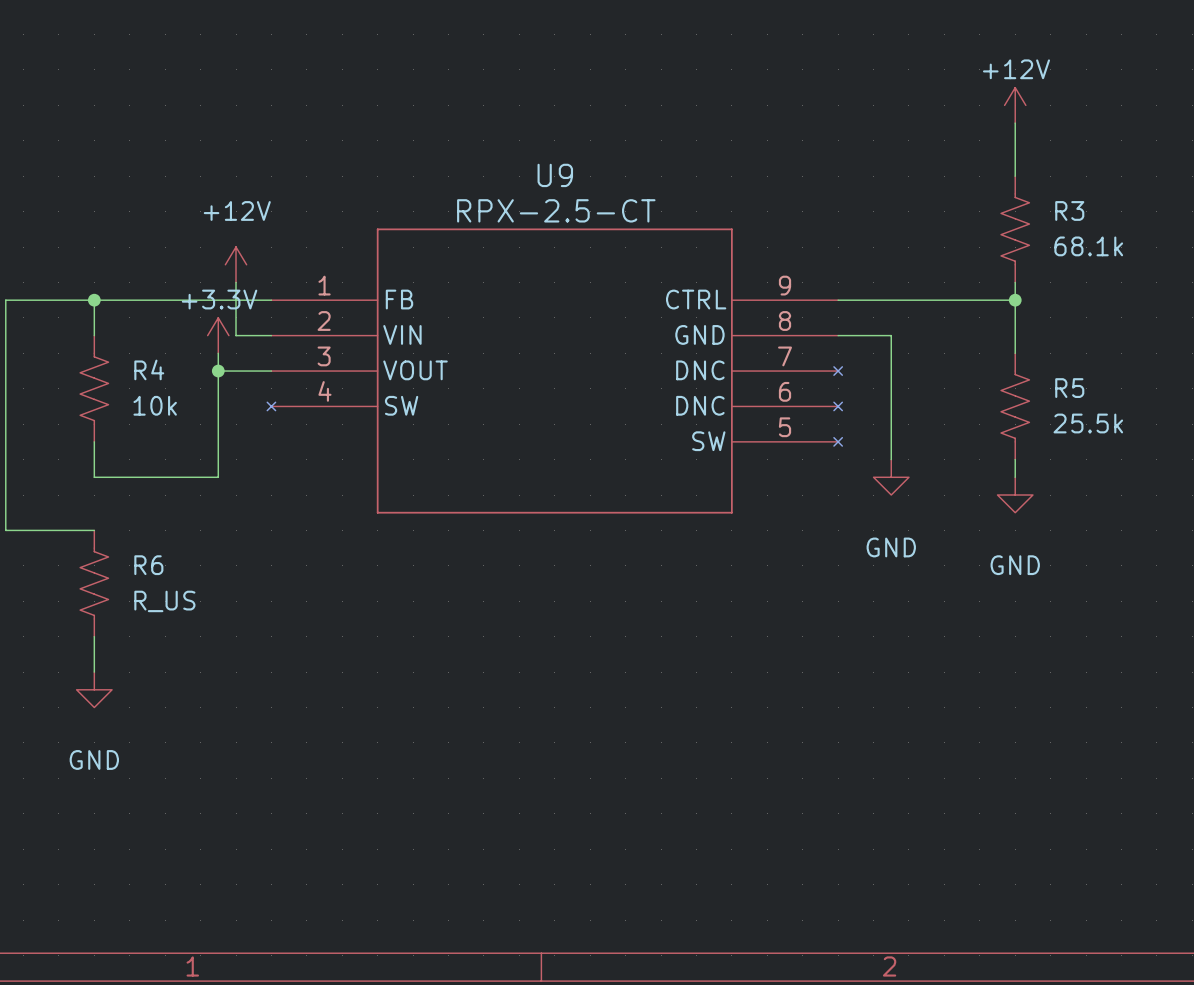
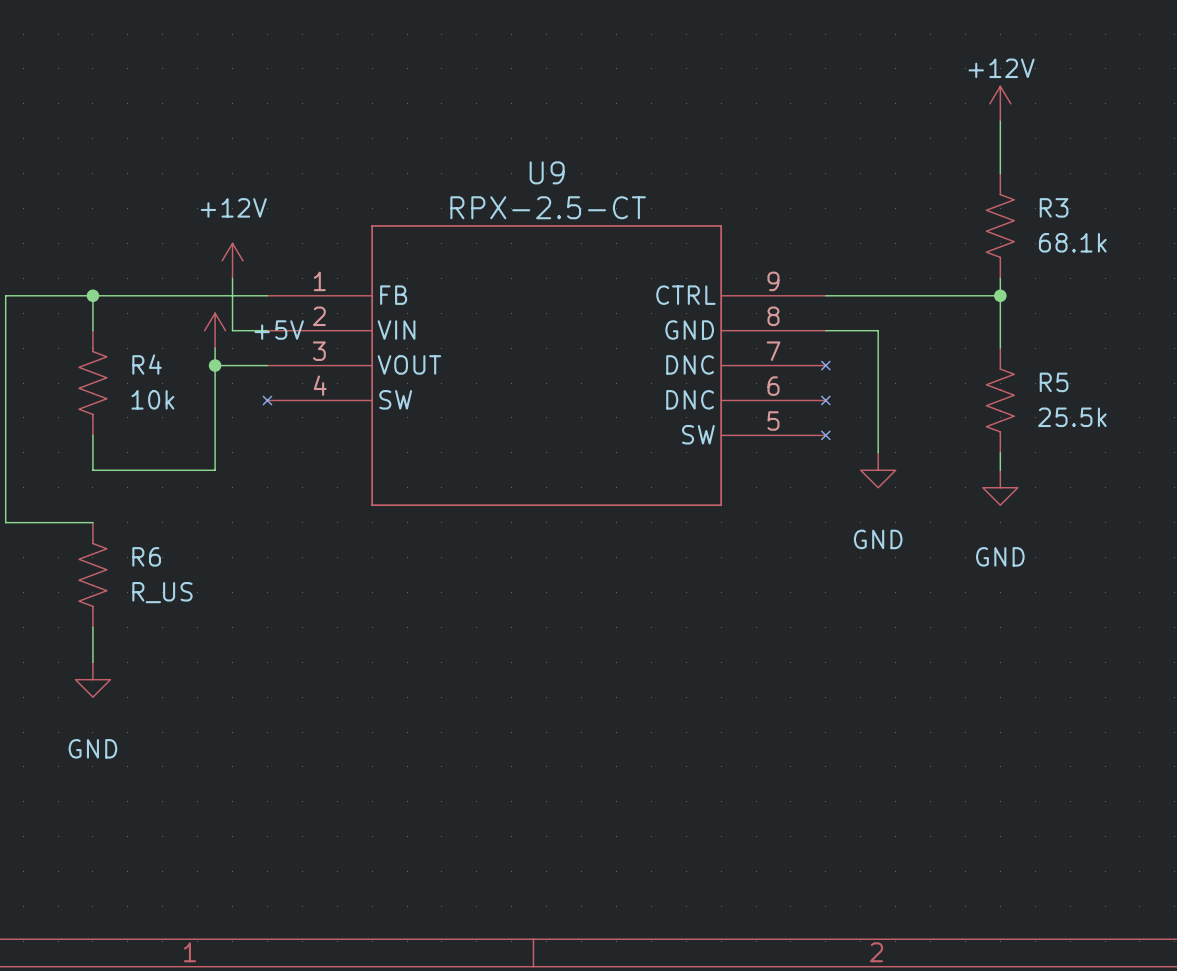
power symbol: +3.3V (218, 335) -> +5V (215, 330)

